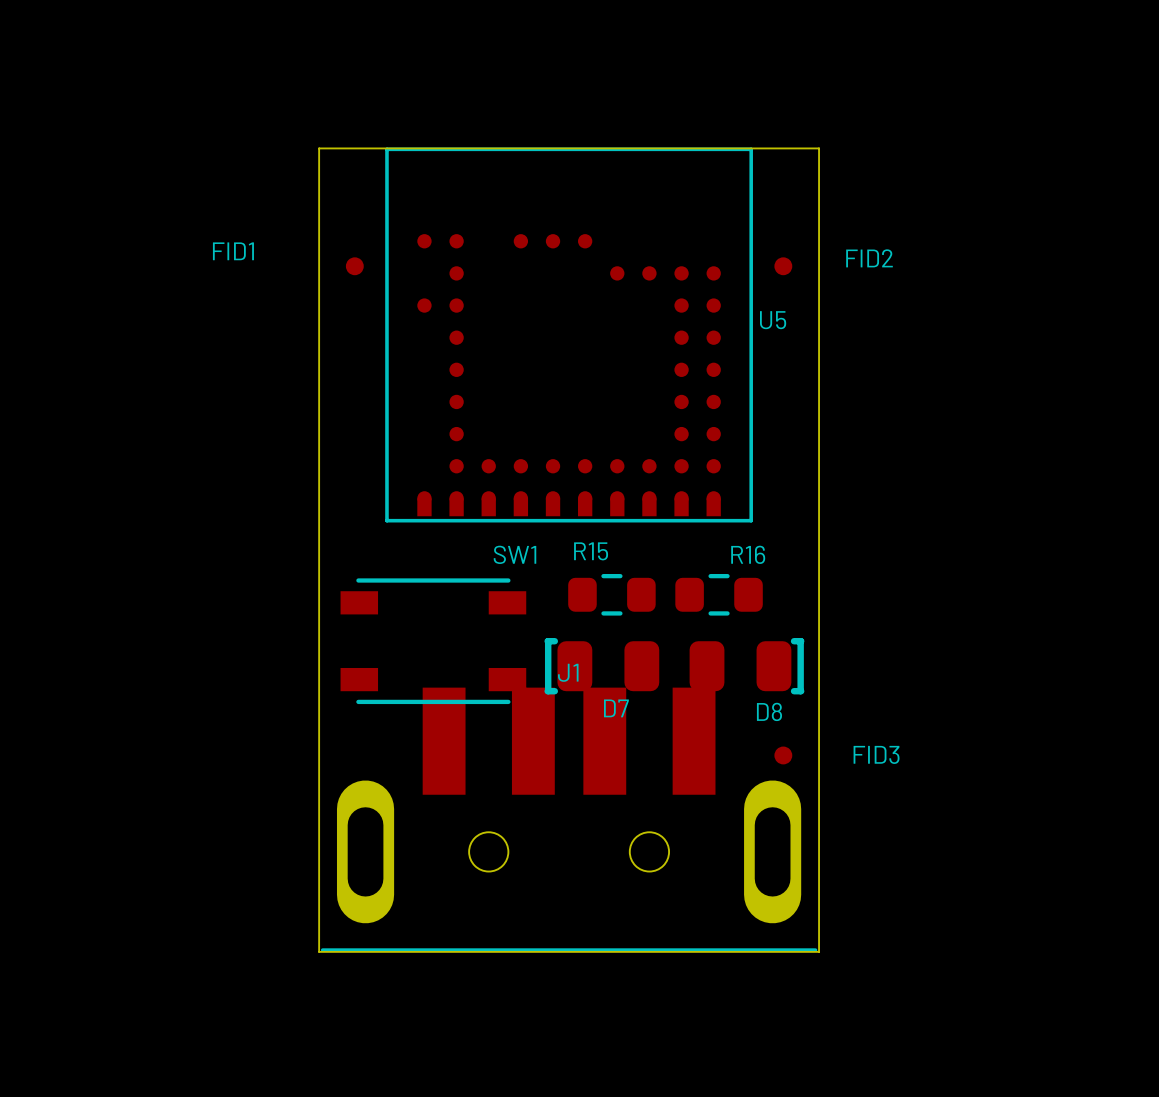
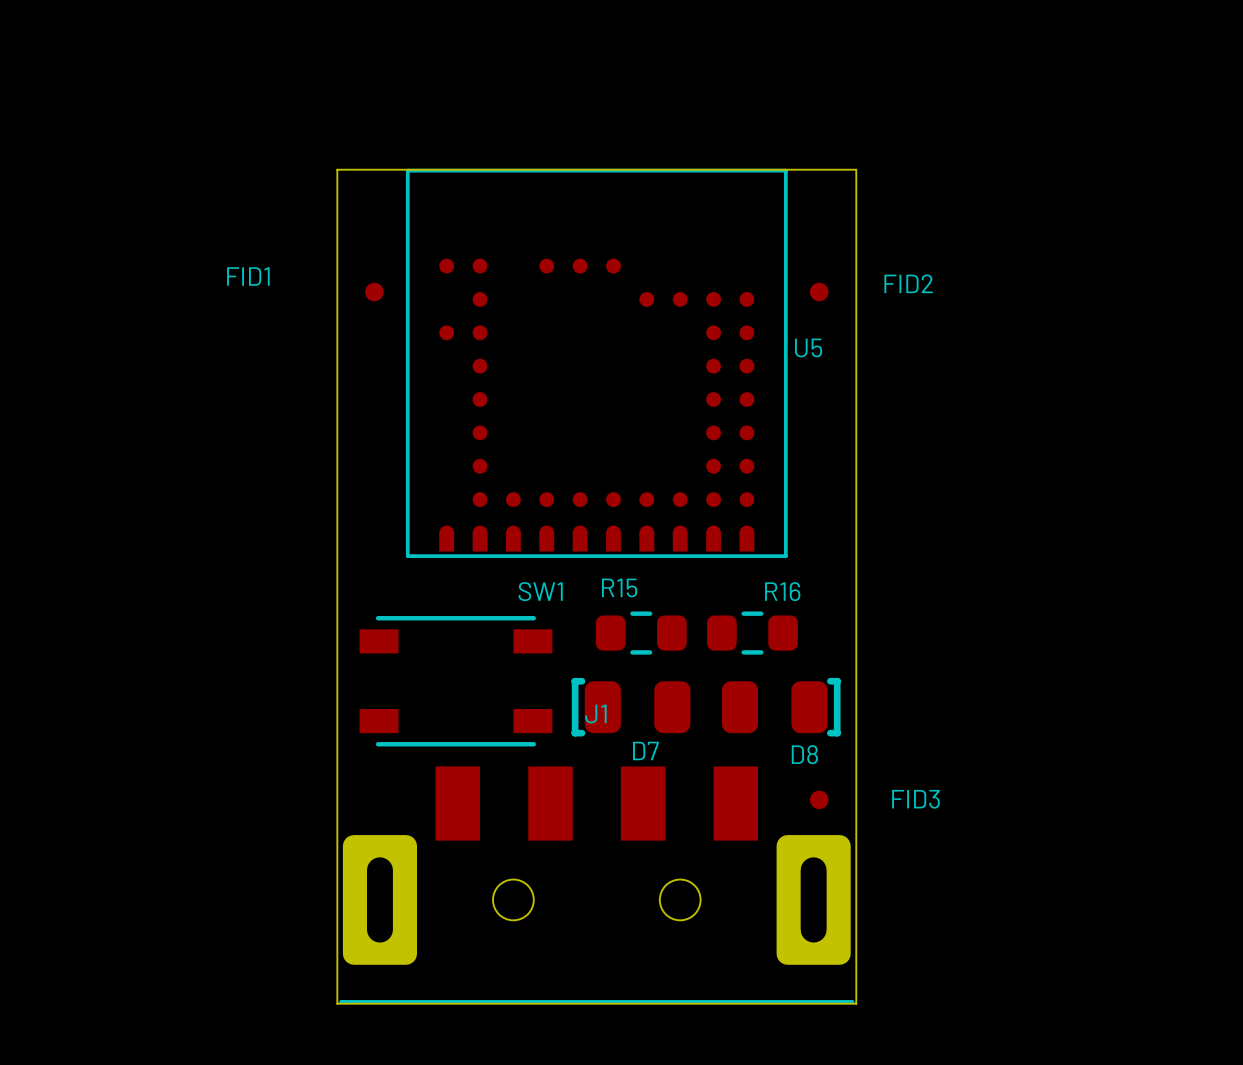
J1 footprint: [320, 687, 818, 952] -> [339, 766, 855, 1004]

